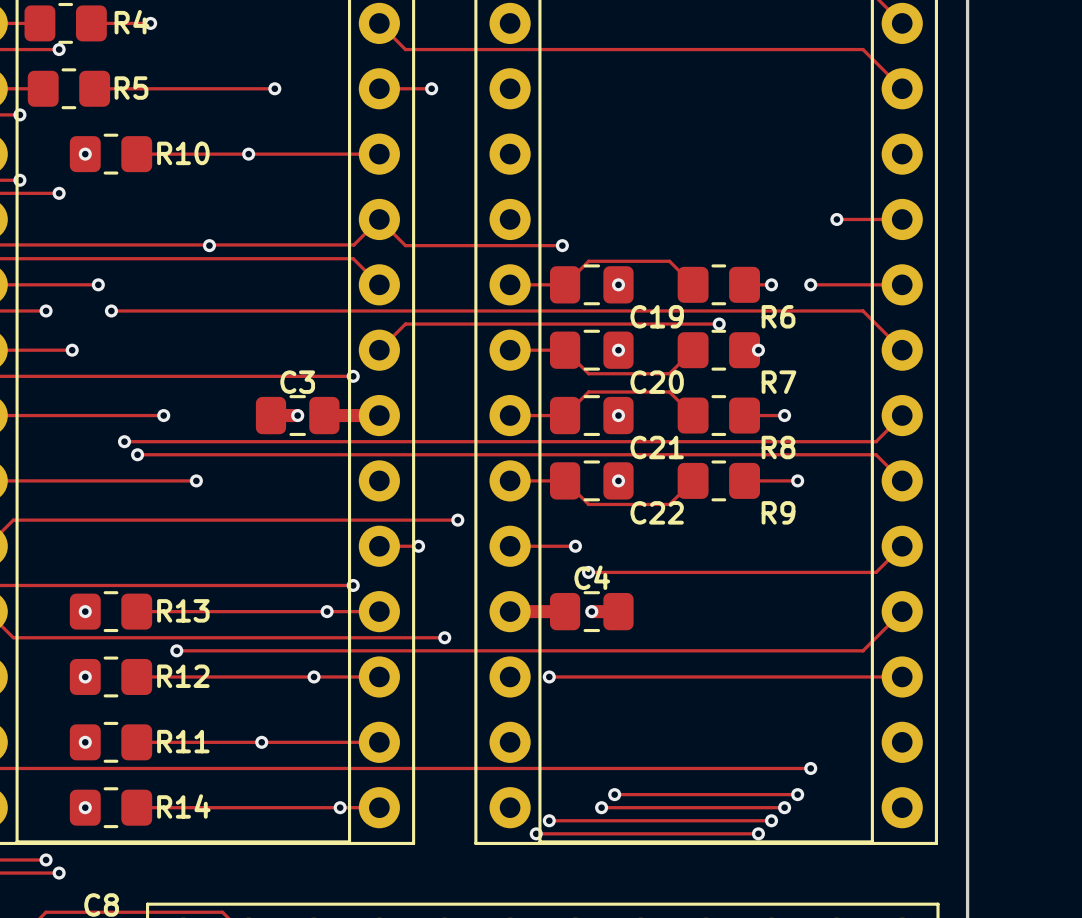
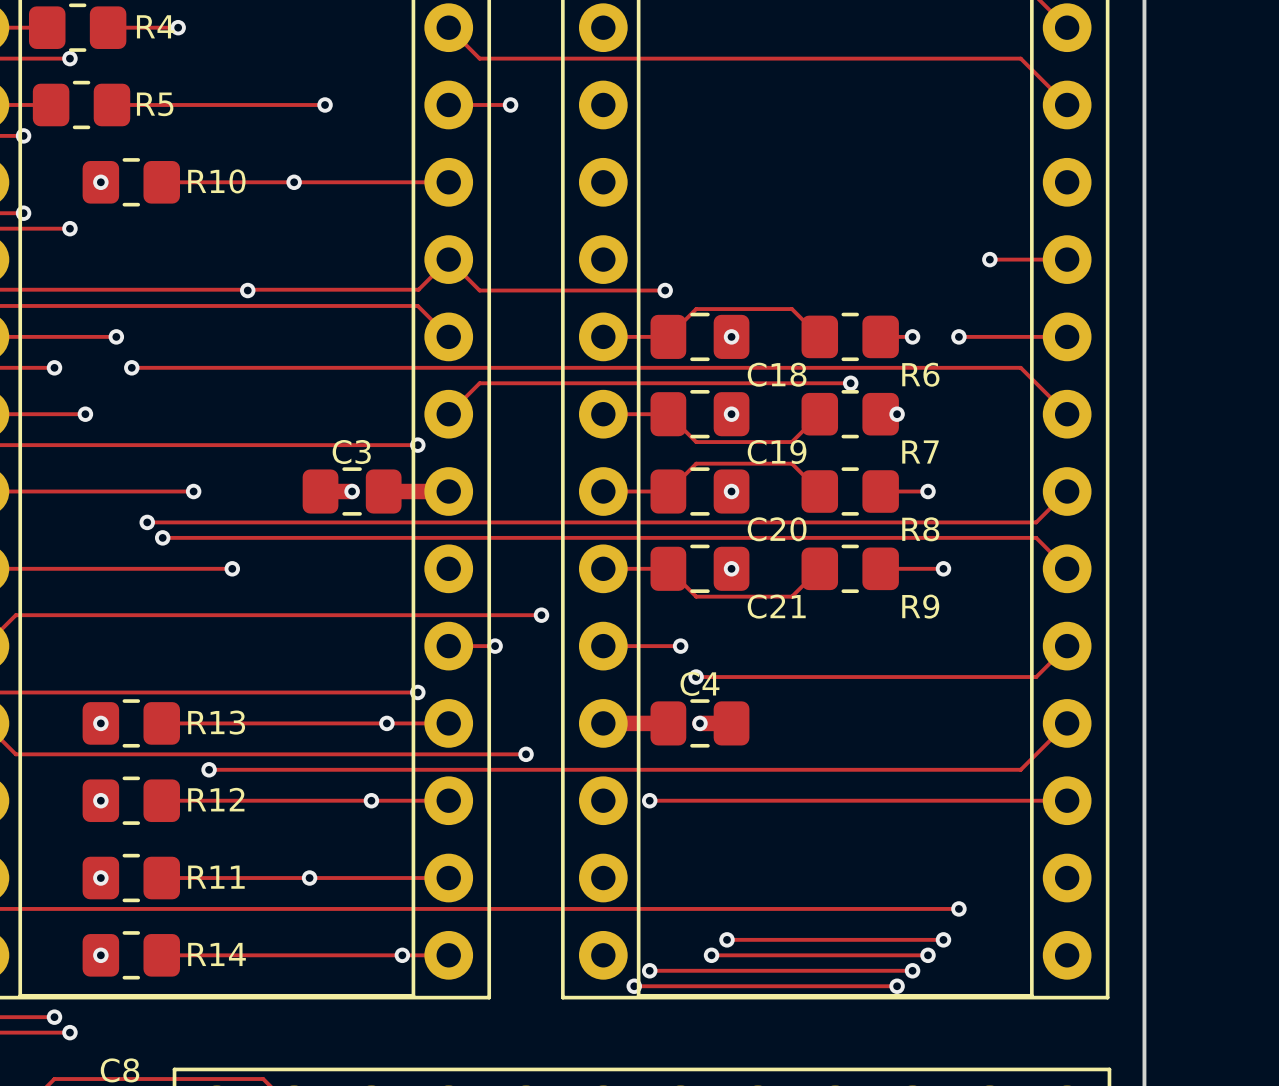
C19 name: C19 (657, 316) -> C18 (777, 374)
C20 name: C20 (657, 382) -> C19 (777, 452)
C21 name: C21 (657, 447) -> C20 (777, 529)
C22 name: C22 (657, 512) -> C21 (776, 606)

